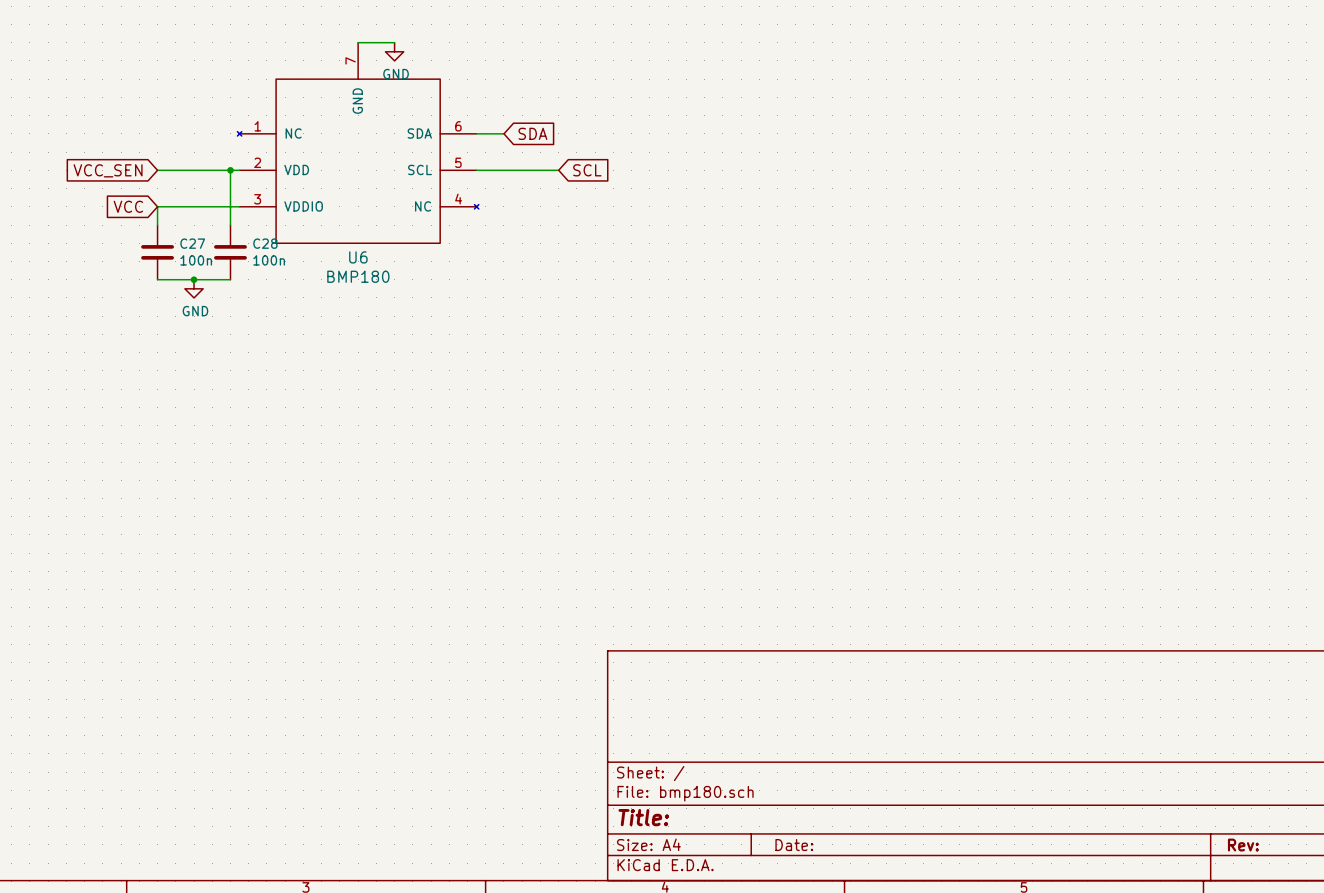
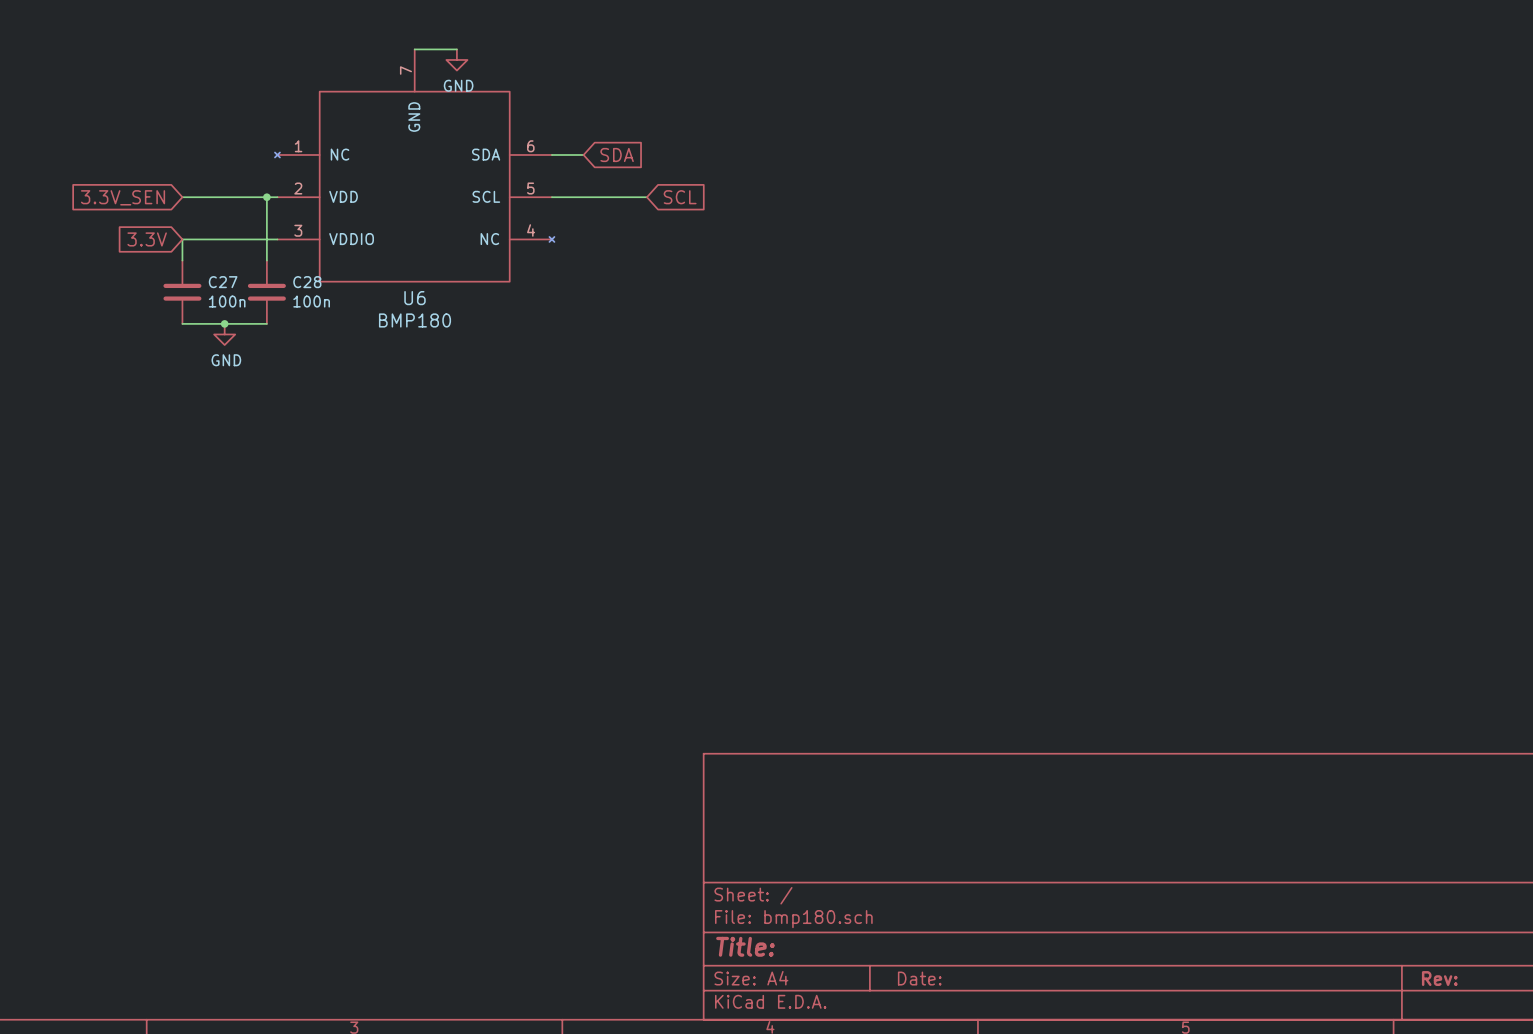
global label: VCC_SEN (108, 170) -> 3.3V_SEN (123, 197)
global label: VCC (128, 206) -> 3.3V (147, 239)

